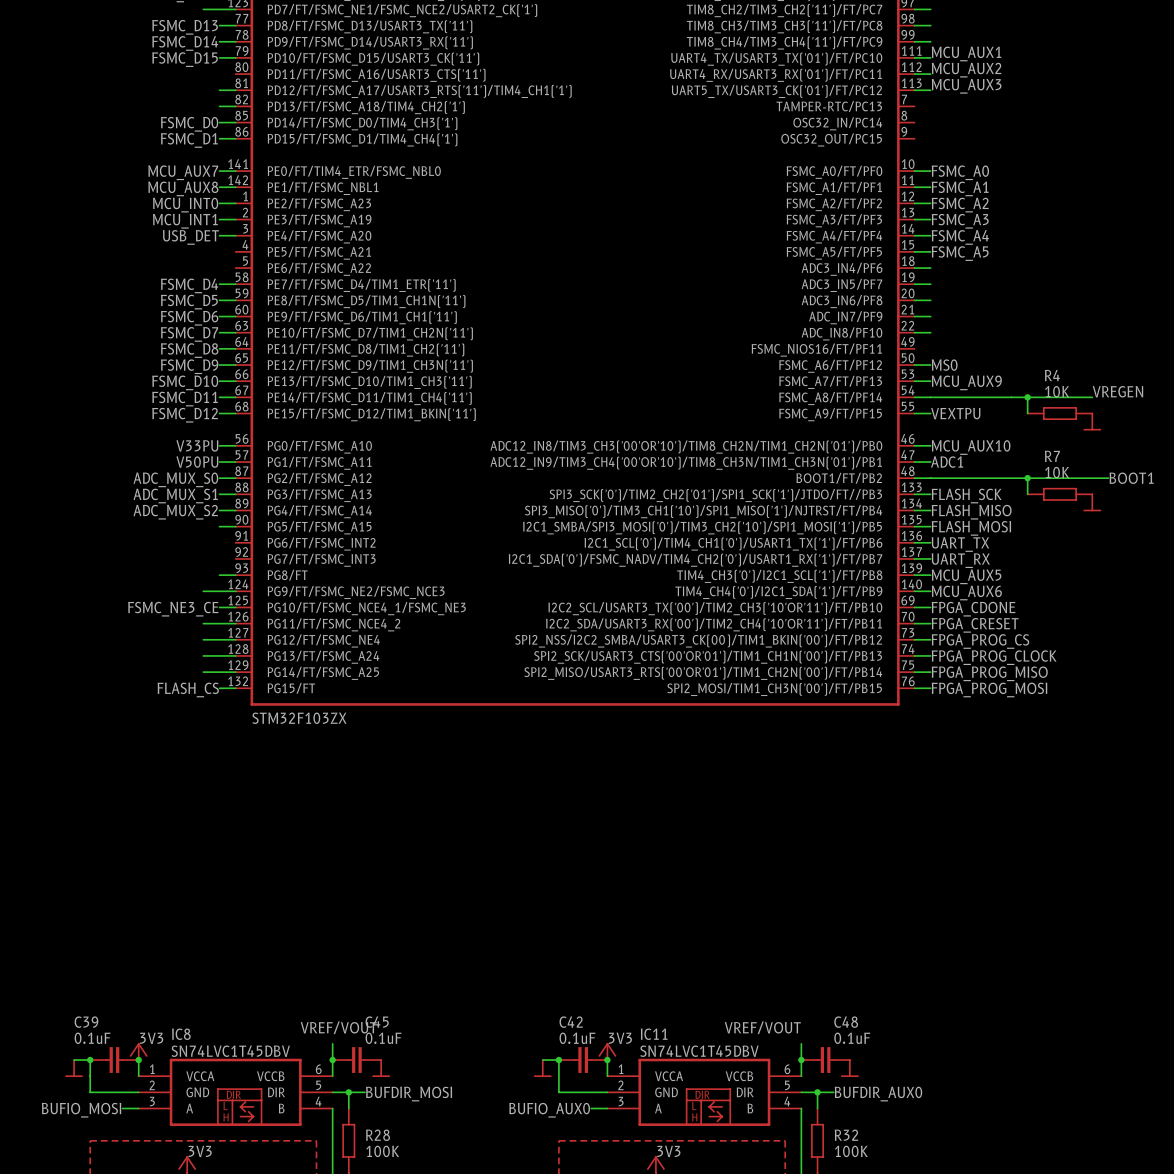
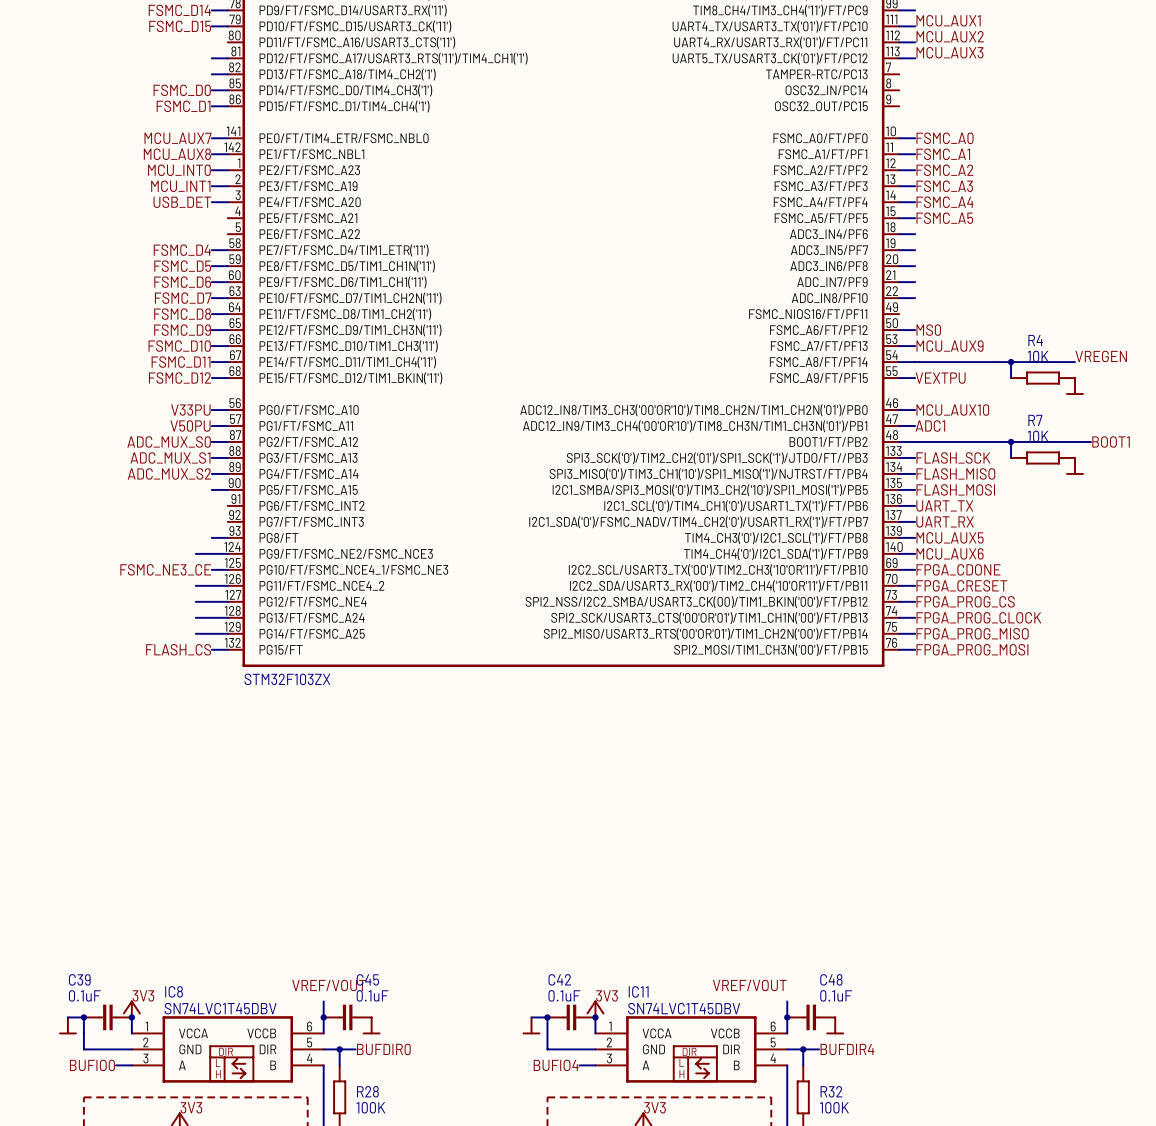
label: BUFDIR_MOSI (409, 1094) -> BUFDIR0 (383, 1049)
label: BUFDIR_AUX0 (878, 1094) -> BUFDIR4 (847, 1049)
label: BUFIO_MOSI (81, 1110) -> BUFIO0 (92, 1065)
label: BUFIO_AUX0 (549, 1110) -> BUFIO4 (556, 1065)

